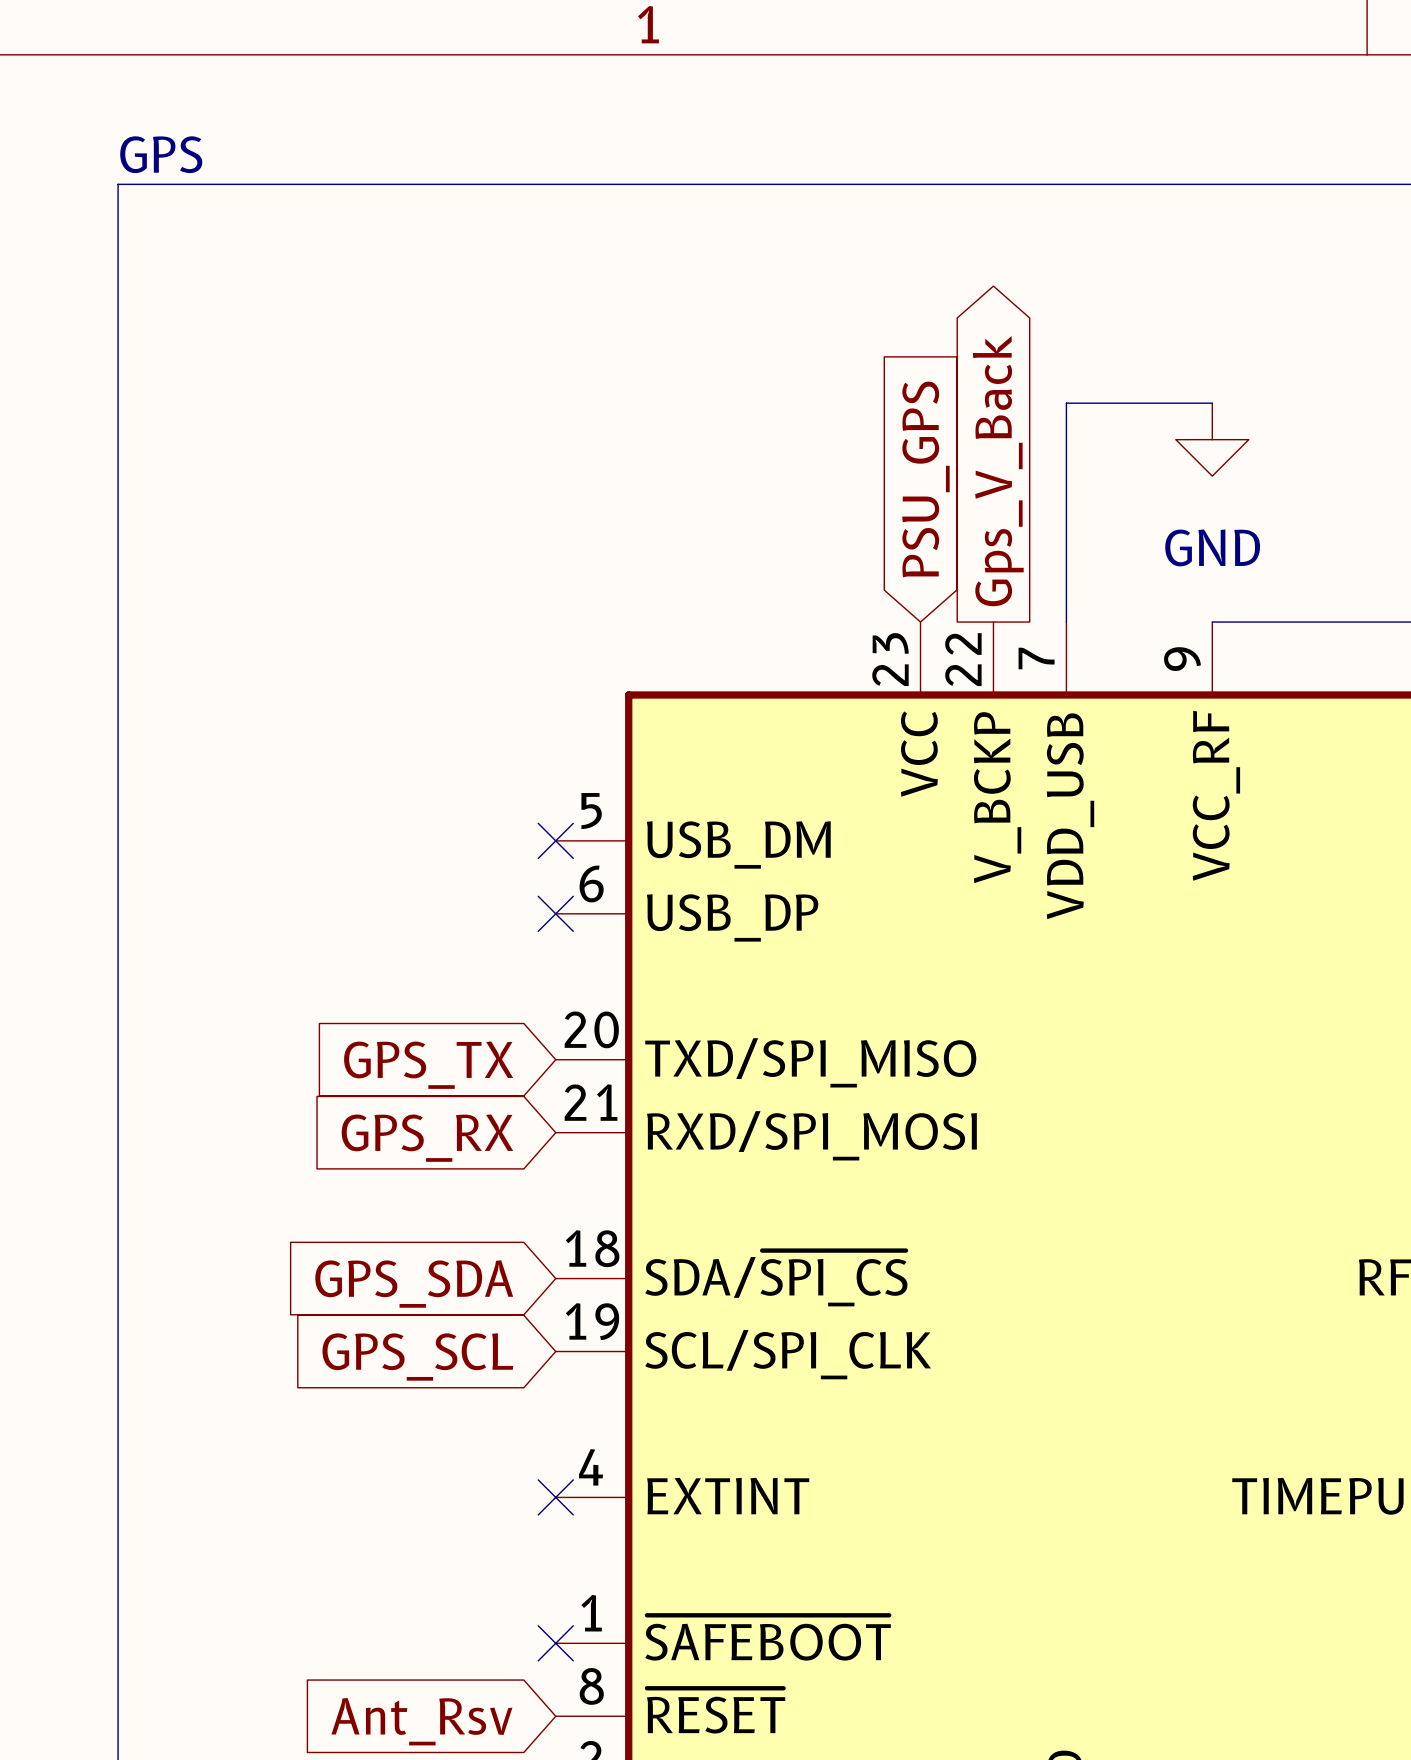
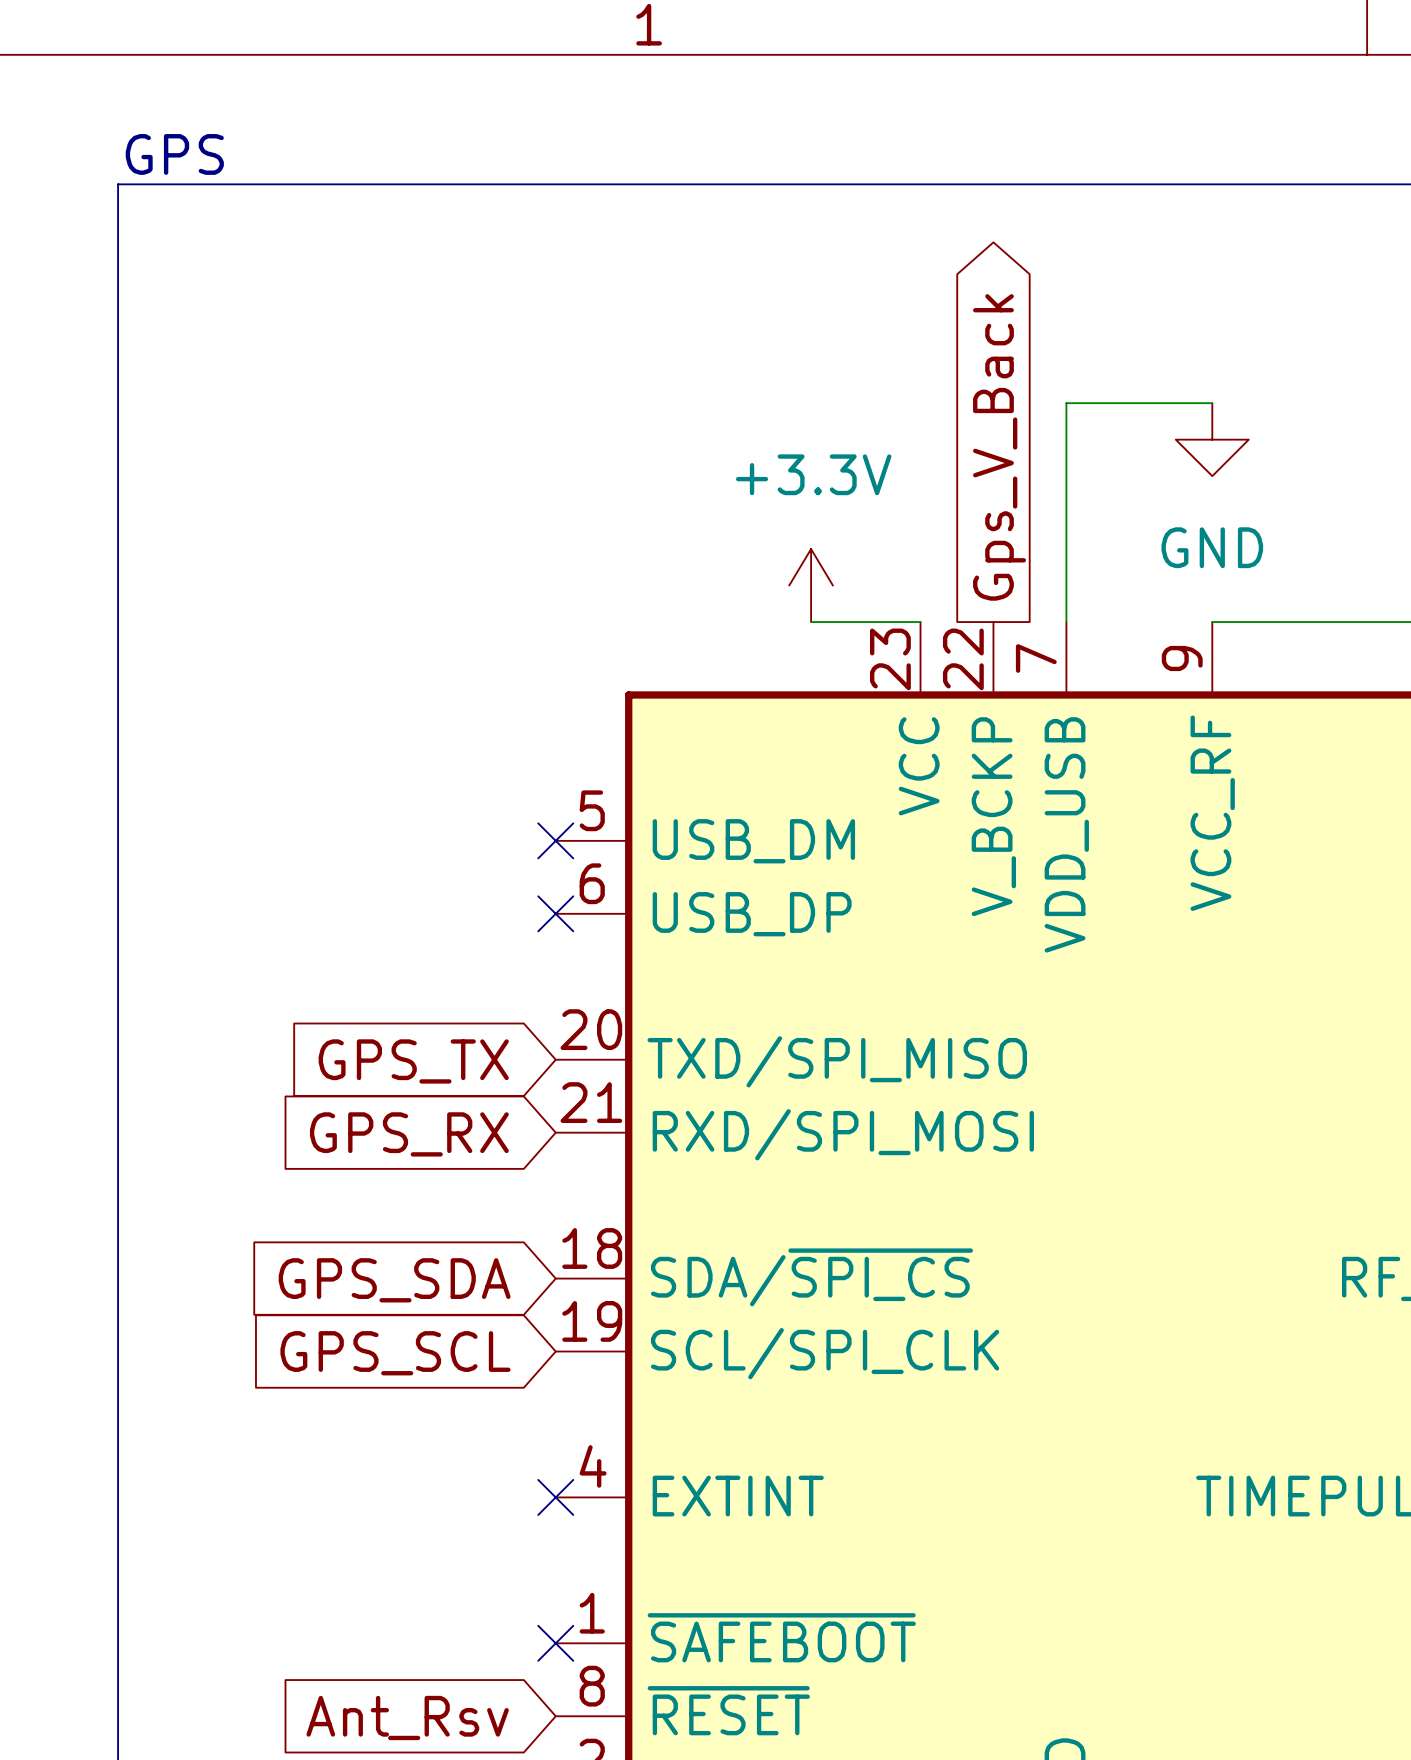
global label: PSU_GPS (925, 479) -> none
power symbol: none -> +3.3V (811, 585)
wire: none -> (811, 622) (920, 622)

